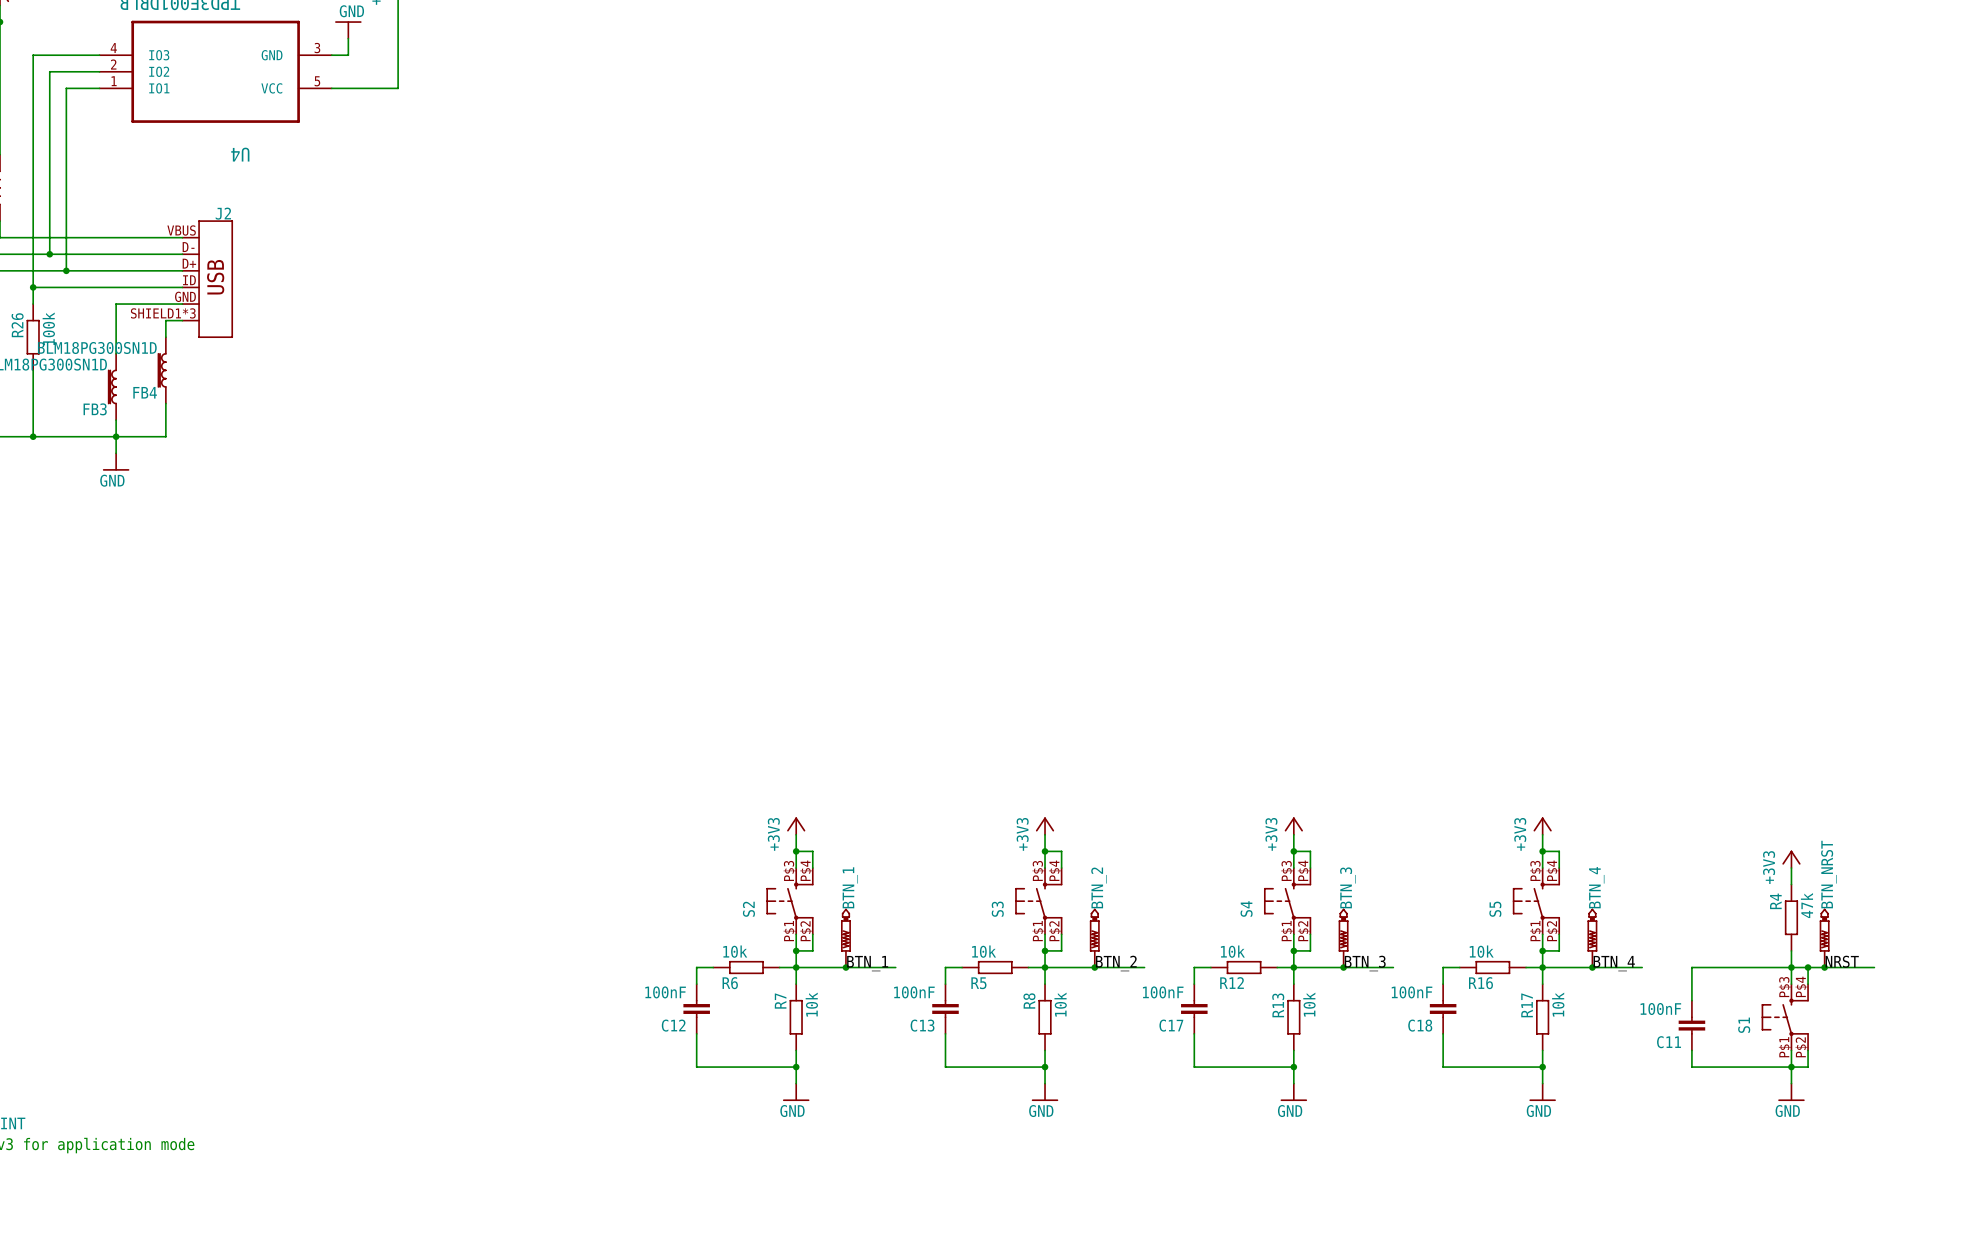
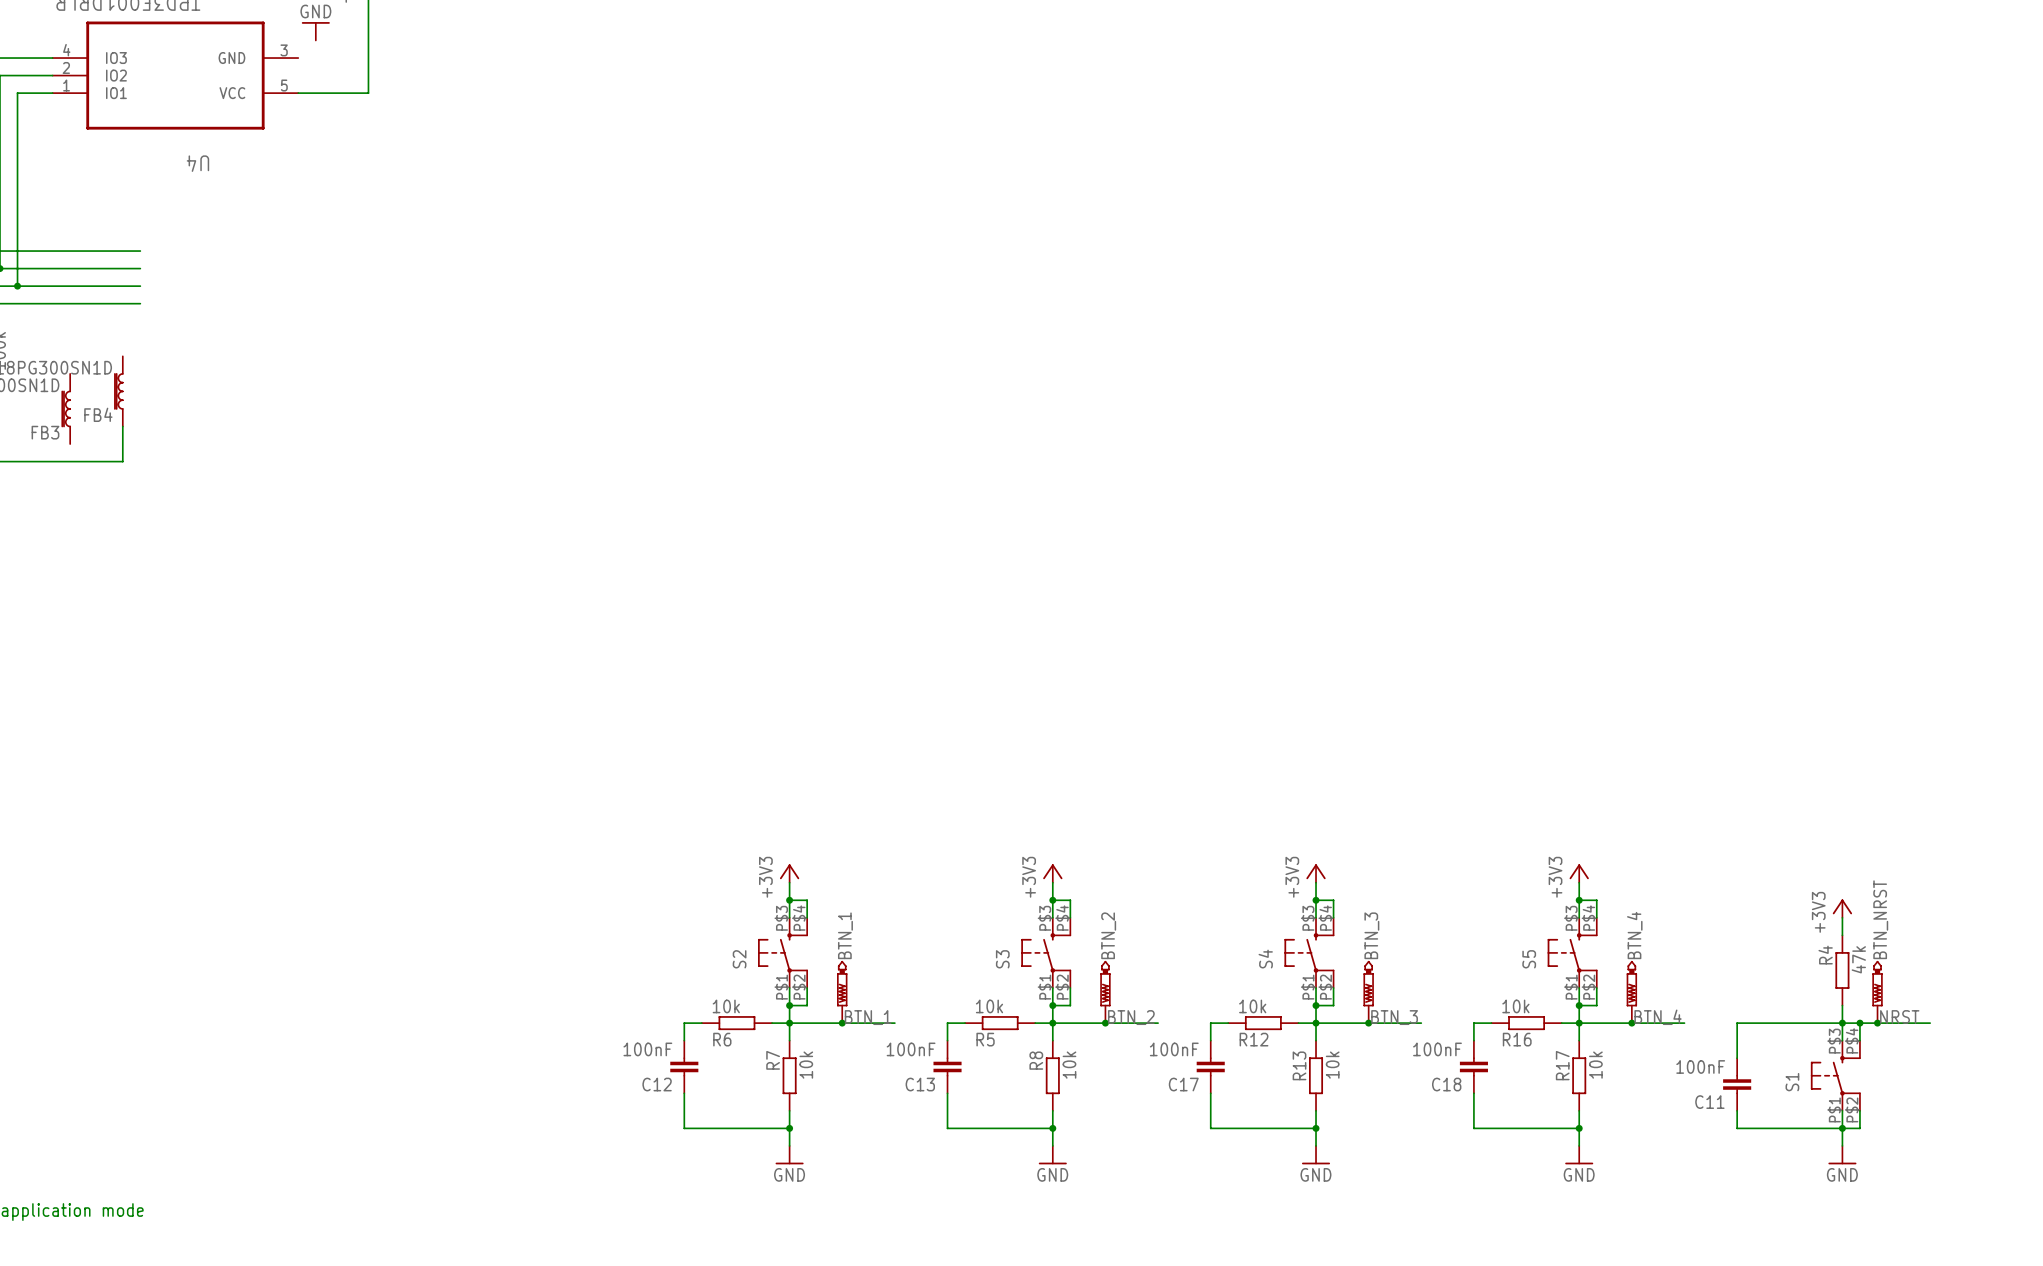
wire: (348, 38) (348, 55) (331, 55) -> none
J2: (207, 279) -> none
wire: (182, 304) (116, 304) (116, 353) -> none
wire: (182, 320) (165, 320) (165, 337) -> none
wire: (116, 420) (116, 453) -> none
junction: (116, 436) -> none
power symbol: GND (116, 462) -> none

